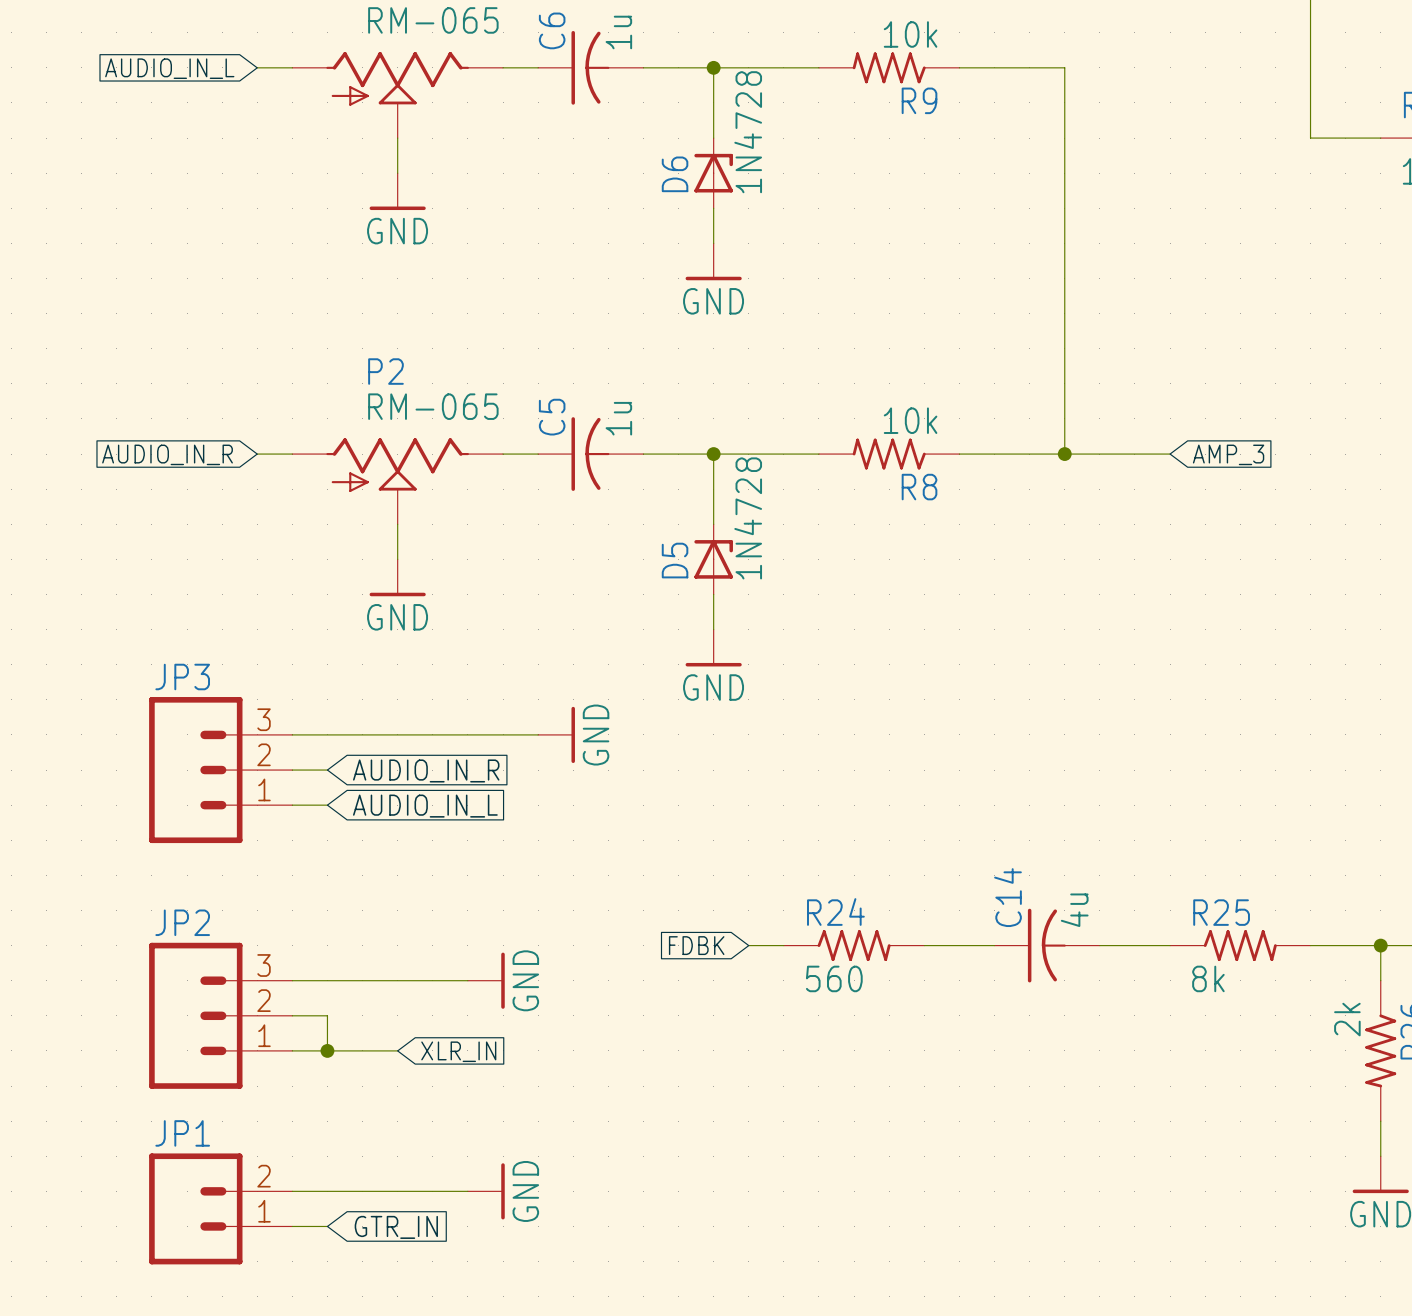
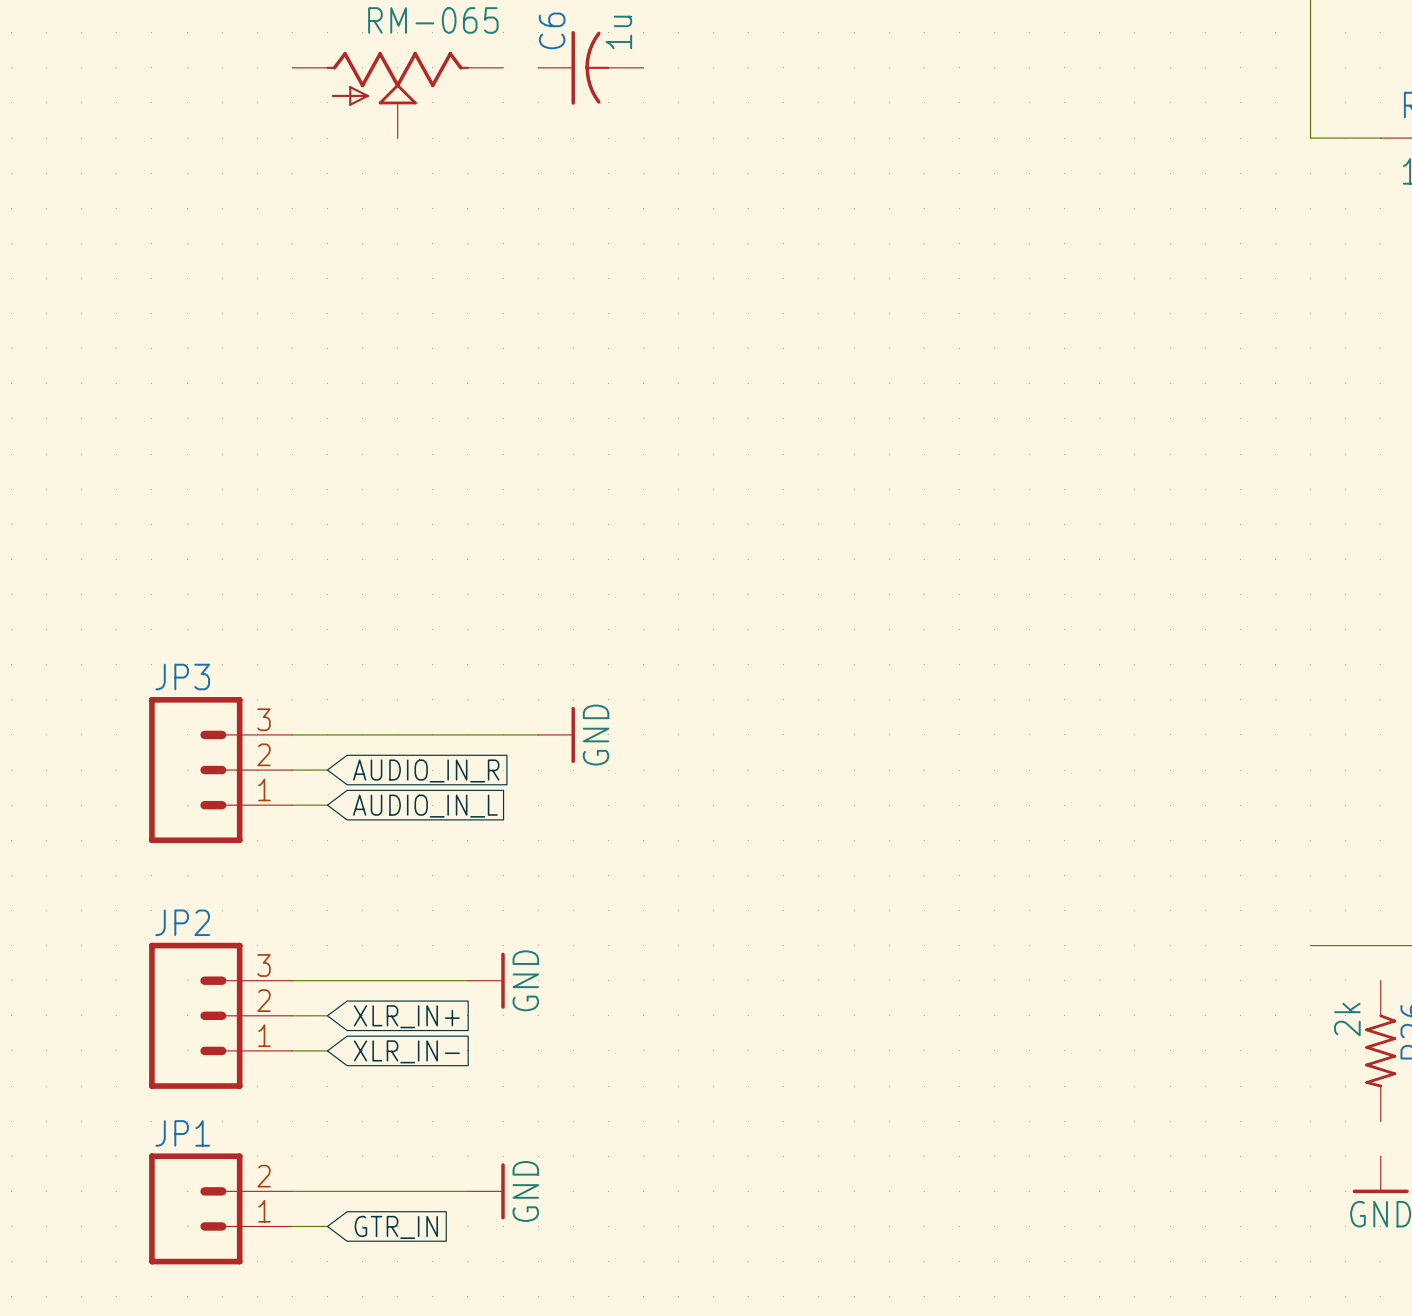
wire: (257, 67) (292, 67) -> none
wire: (503, 67) (538, 67) -> none
wire: (643, 67) (818, 67) -> none
wire: (713, 67) (713, 138) -> none
junction: (713, 67) -> none
R9: 10k (889, 67) -> none
wire: (959, 67) (1064, 67) (1064, 454) -> none
global label: AUDIO_IN_L (169, 68) -> none
wire: (397, 138) (397, 173) -> none
D6: 1N4728 (713, 173) -> none
power symbol: GND (397, 191) -> none
wire: (713, 208) (713, 243) -> none
power symbol: GND (713, 261) -> none
global label: AUDIO_IN_R (167, 454) -> none
wire: (257, 454) (292, 454) -> none
wire: (503, 454) (538, 454) -> none
C5: 1u (590, 454) -> none
wire: (643, 454) (818, 454) -> none
wire: (713, 454) (713, 524) -> none
junction: (713, 454) -> none
R8: 10k (889, 454) -> none
wire: (959, 454) (1170, 454) -> none
junction: (1064, 454) -> none
global label: AMP_3 (1228, 454) -> none
P2: RM-065 (397, 481) -> none
wire: (397, 524) (397, 559) -> none
D5: 1N4728 (713, 559) -> none
power symbol: GND (397, 577) -> none
wire: (713, 594) (713, 629) -> none
power symbol: GND (713, 648) -> none
global label: FDBK (696, 945) -> none
wire: (748, 945) (783, 945) -> none
R24: 560 (854, 945) -> none
wire: (924, 945) (994, 945) -> none
C14: 4u (1047, 945) -> none
wire: (1099, 945) (1170, 945) -> none
R25: 8k (1240, 945) -> none
wire: (1380, 945) (1380, 980) -> none
junction: (1380, 945) -> none
wire: (327, 1015) (327, 1050) (397, 1050) -> none
global label: none -> XLR_IN+ (406, 1016)
junction: (327, 1050) -> none
global label: none -> XLR_IN- (406, 1051)
global label: XLR_IN (458, 1051) -> none
wire: (1380, 1121) (1380, 1156) -> none

